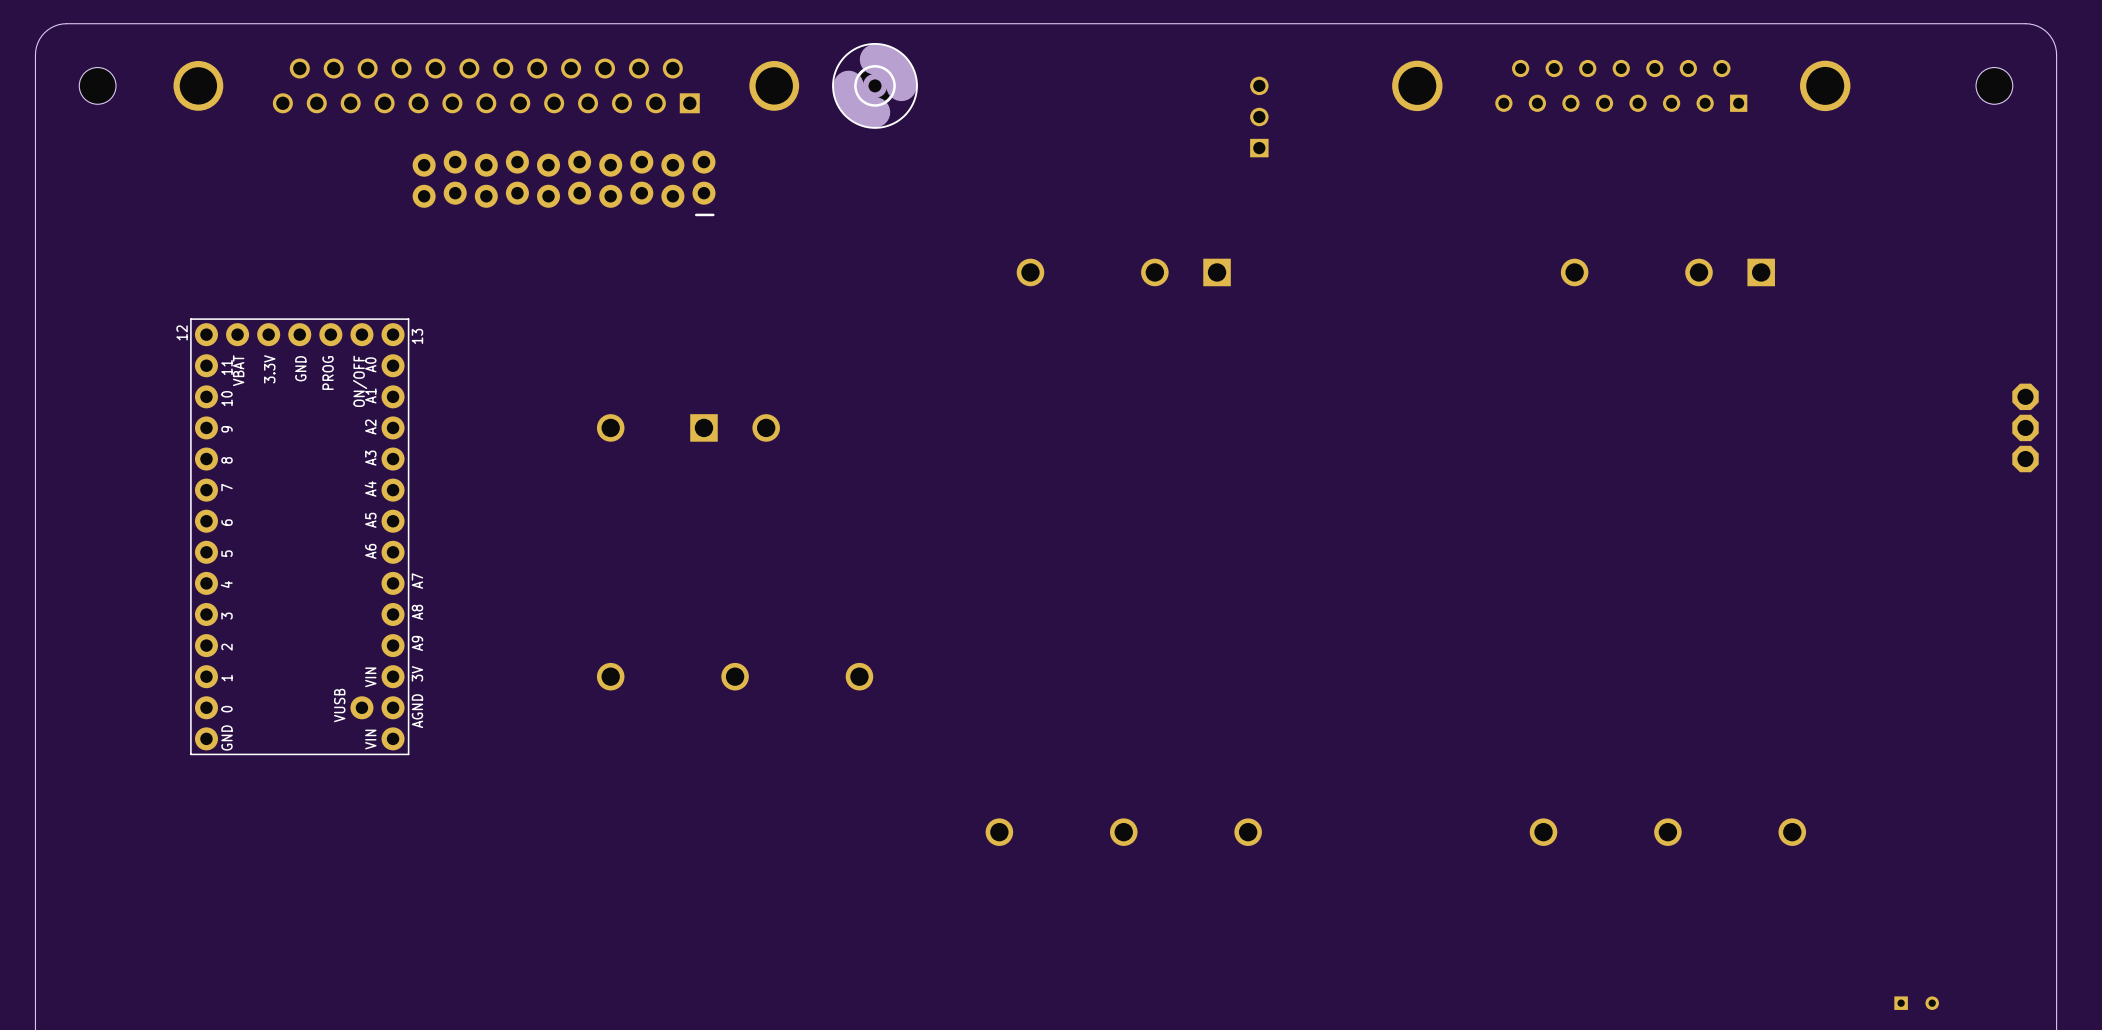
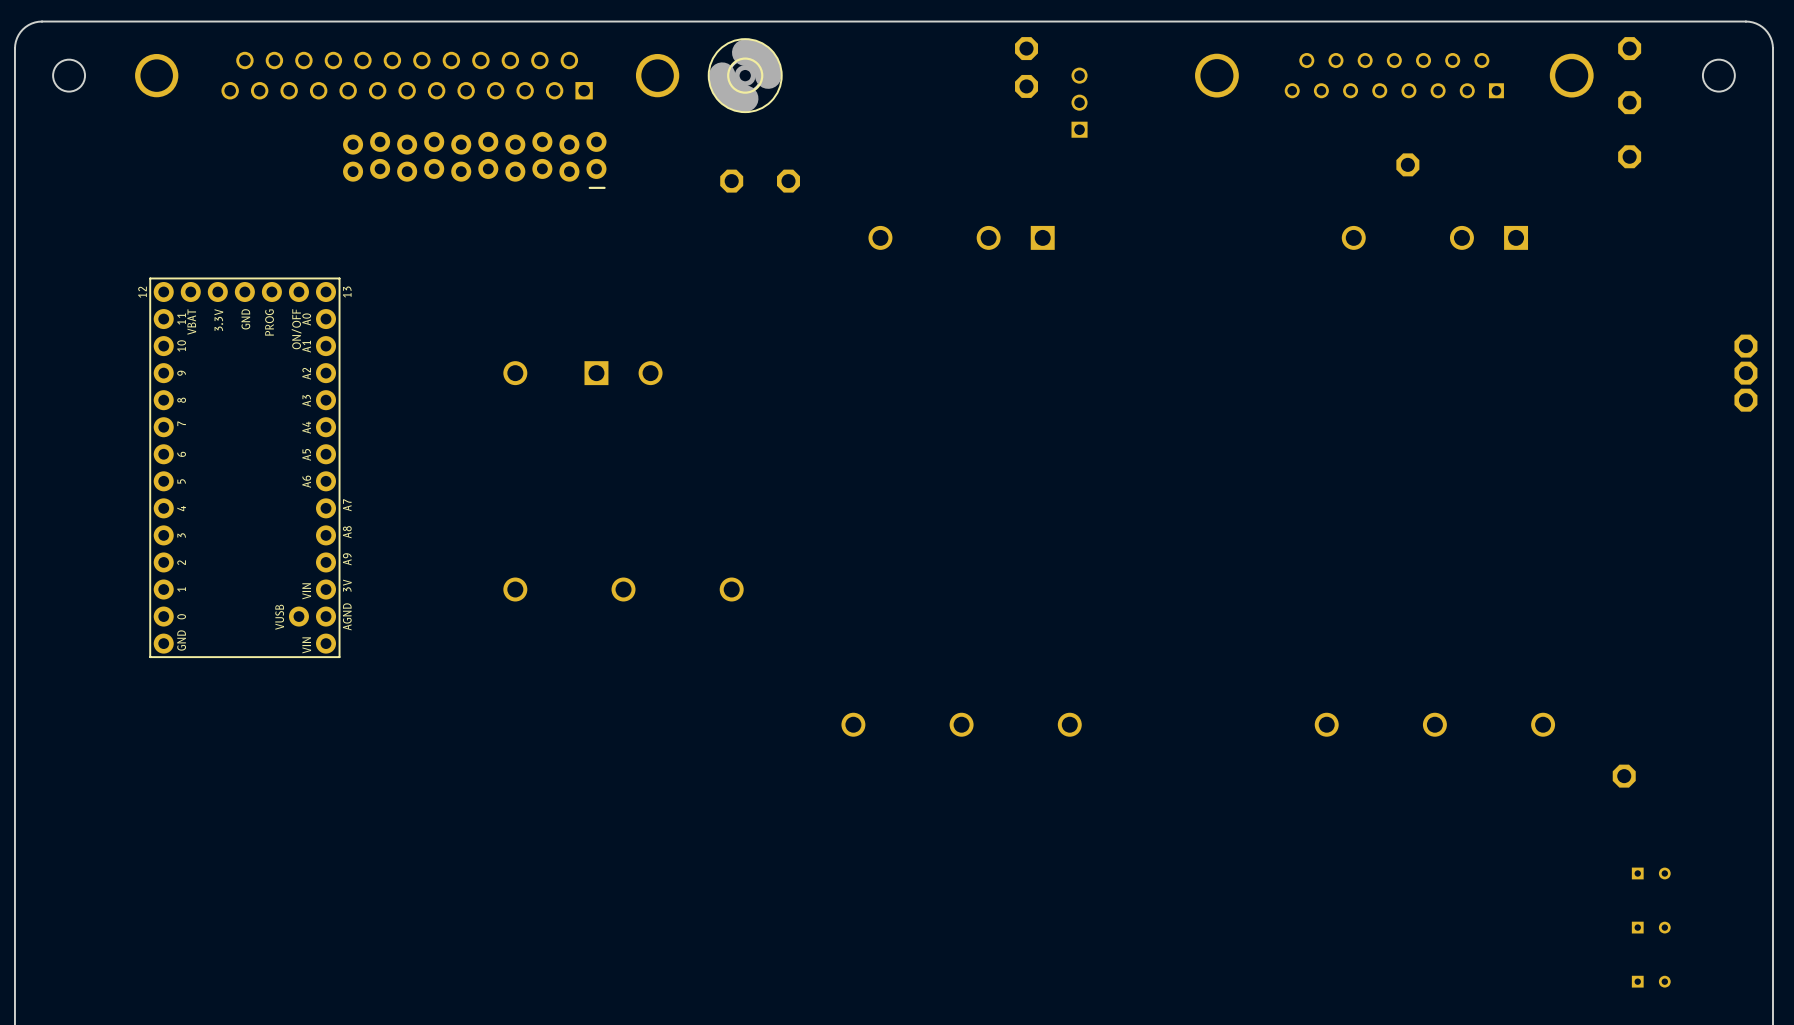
part: none -> (1026, 48)
part: none -> (1629, 48)
part: none -> (1026, 86)
part: none -> (1629, 102)
part: none -> (1629, 156)
part: none -> (1407, 164)
part: none -> (731, 181)
part: none -> (788, 181)
part: none -> (1624, 776)

